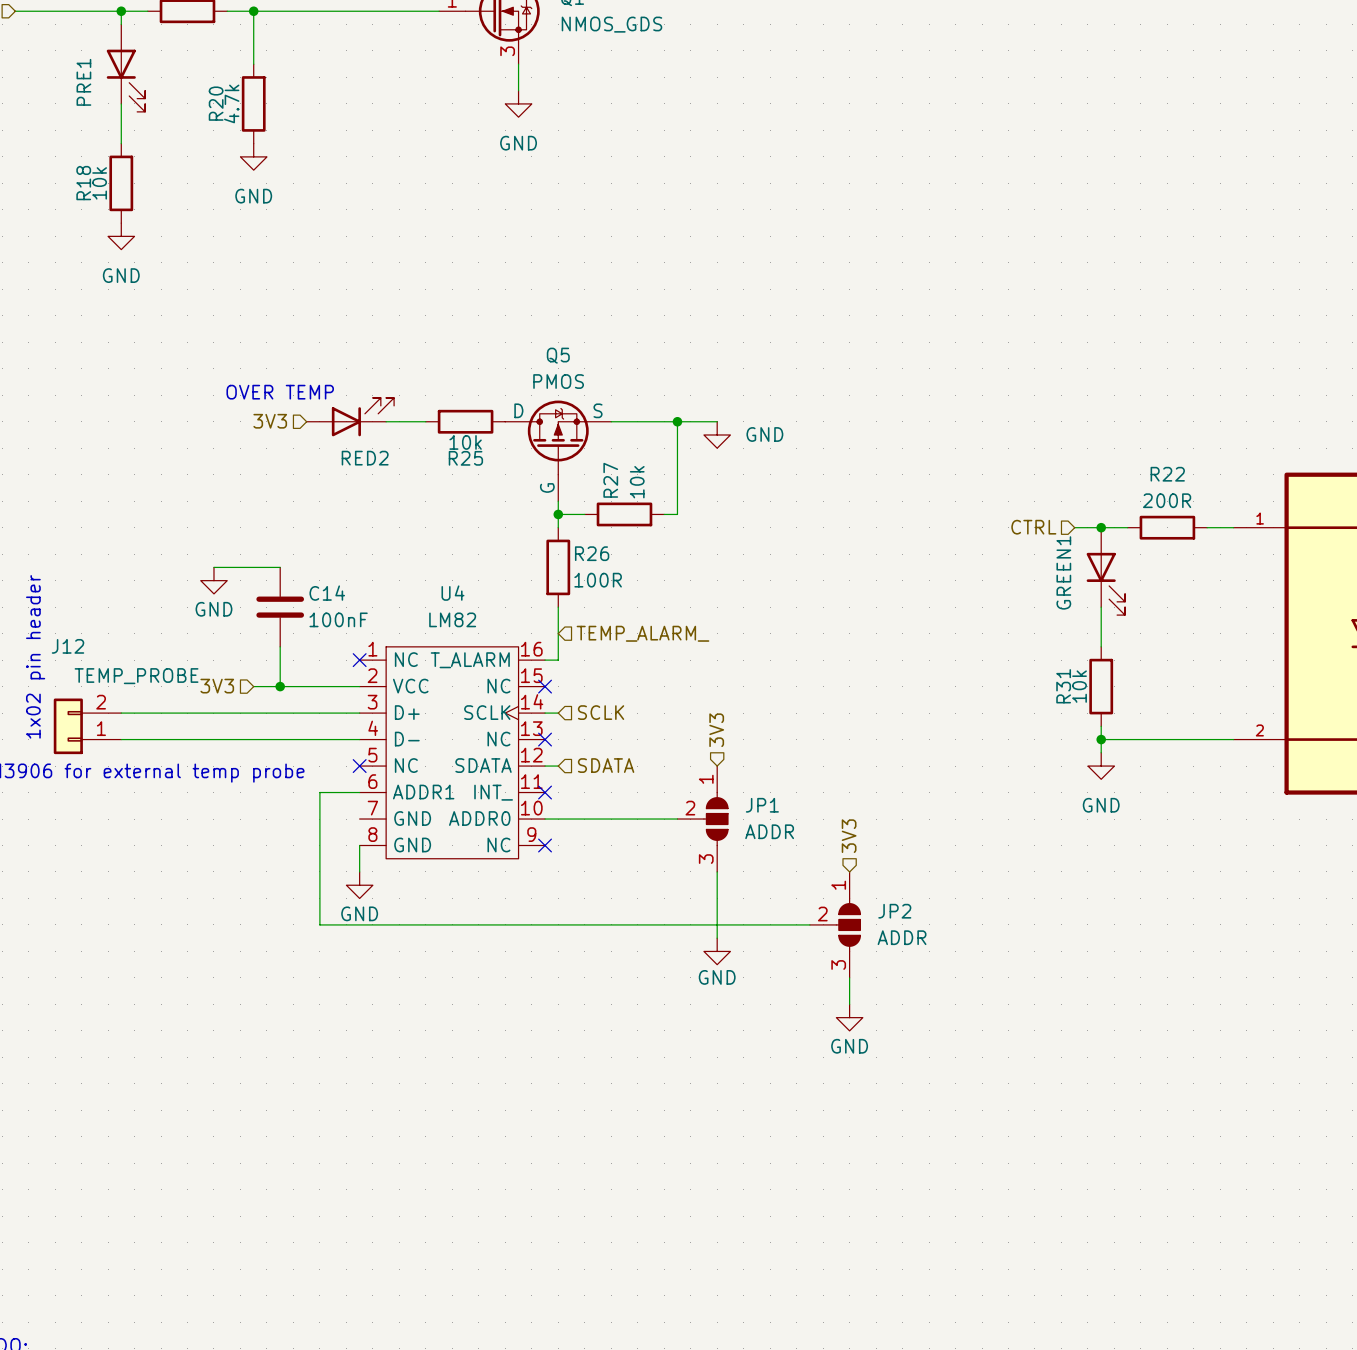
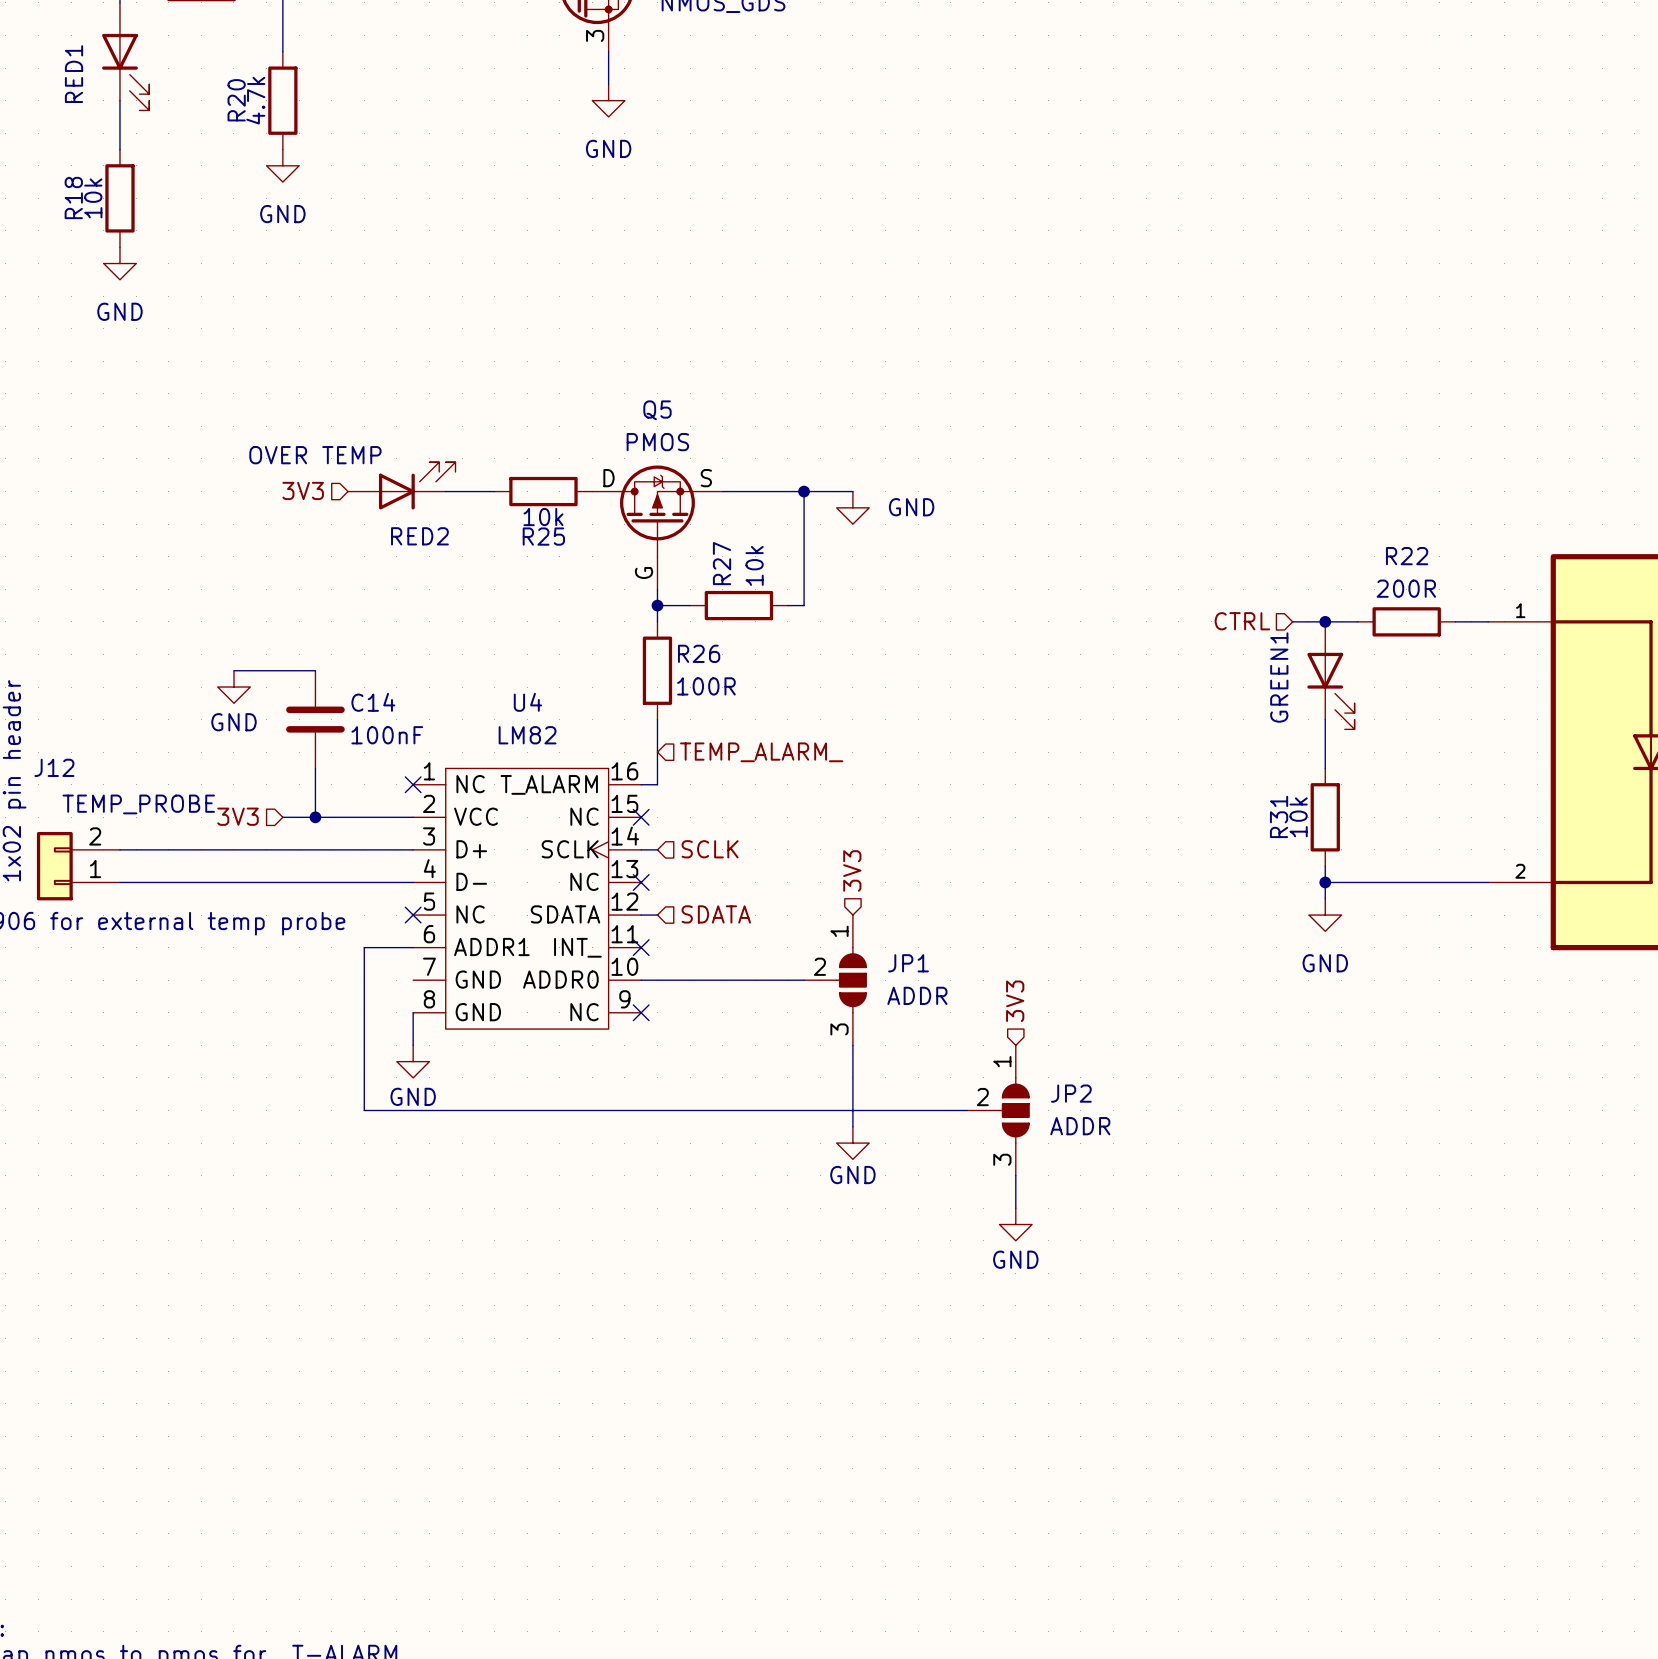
PRE1 name: PRE1 (83, 82) -> RED1 (74, 74)

